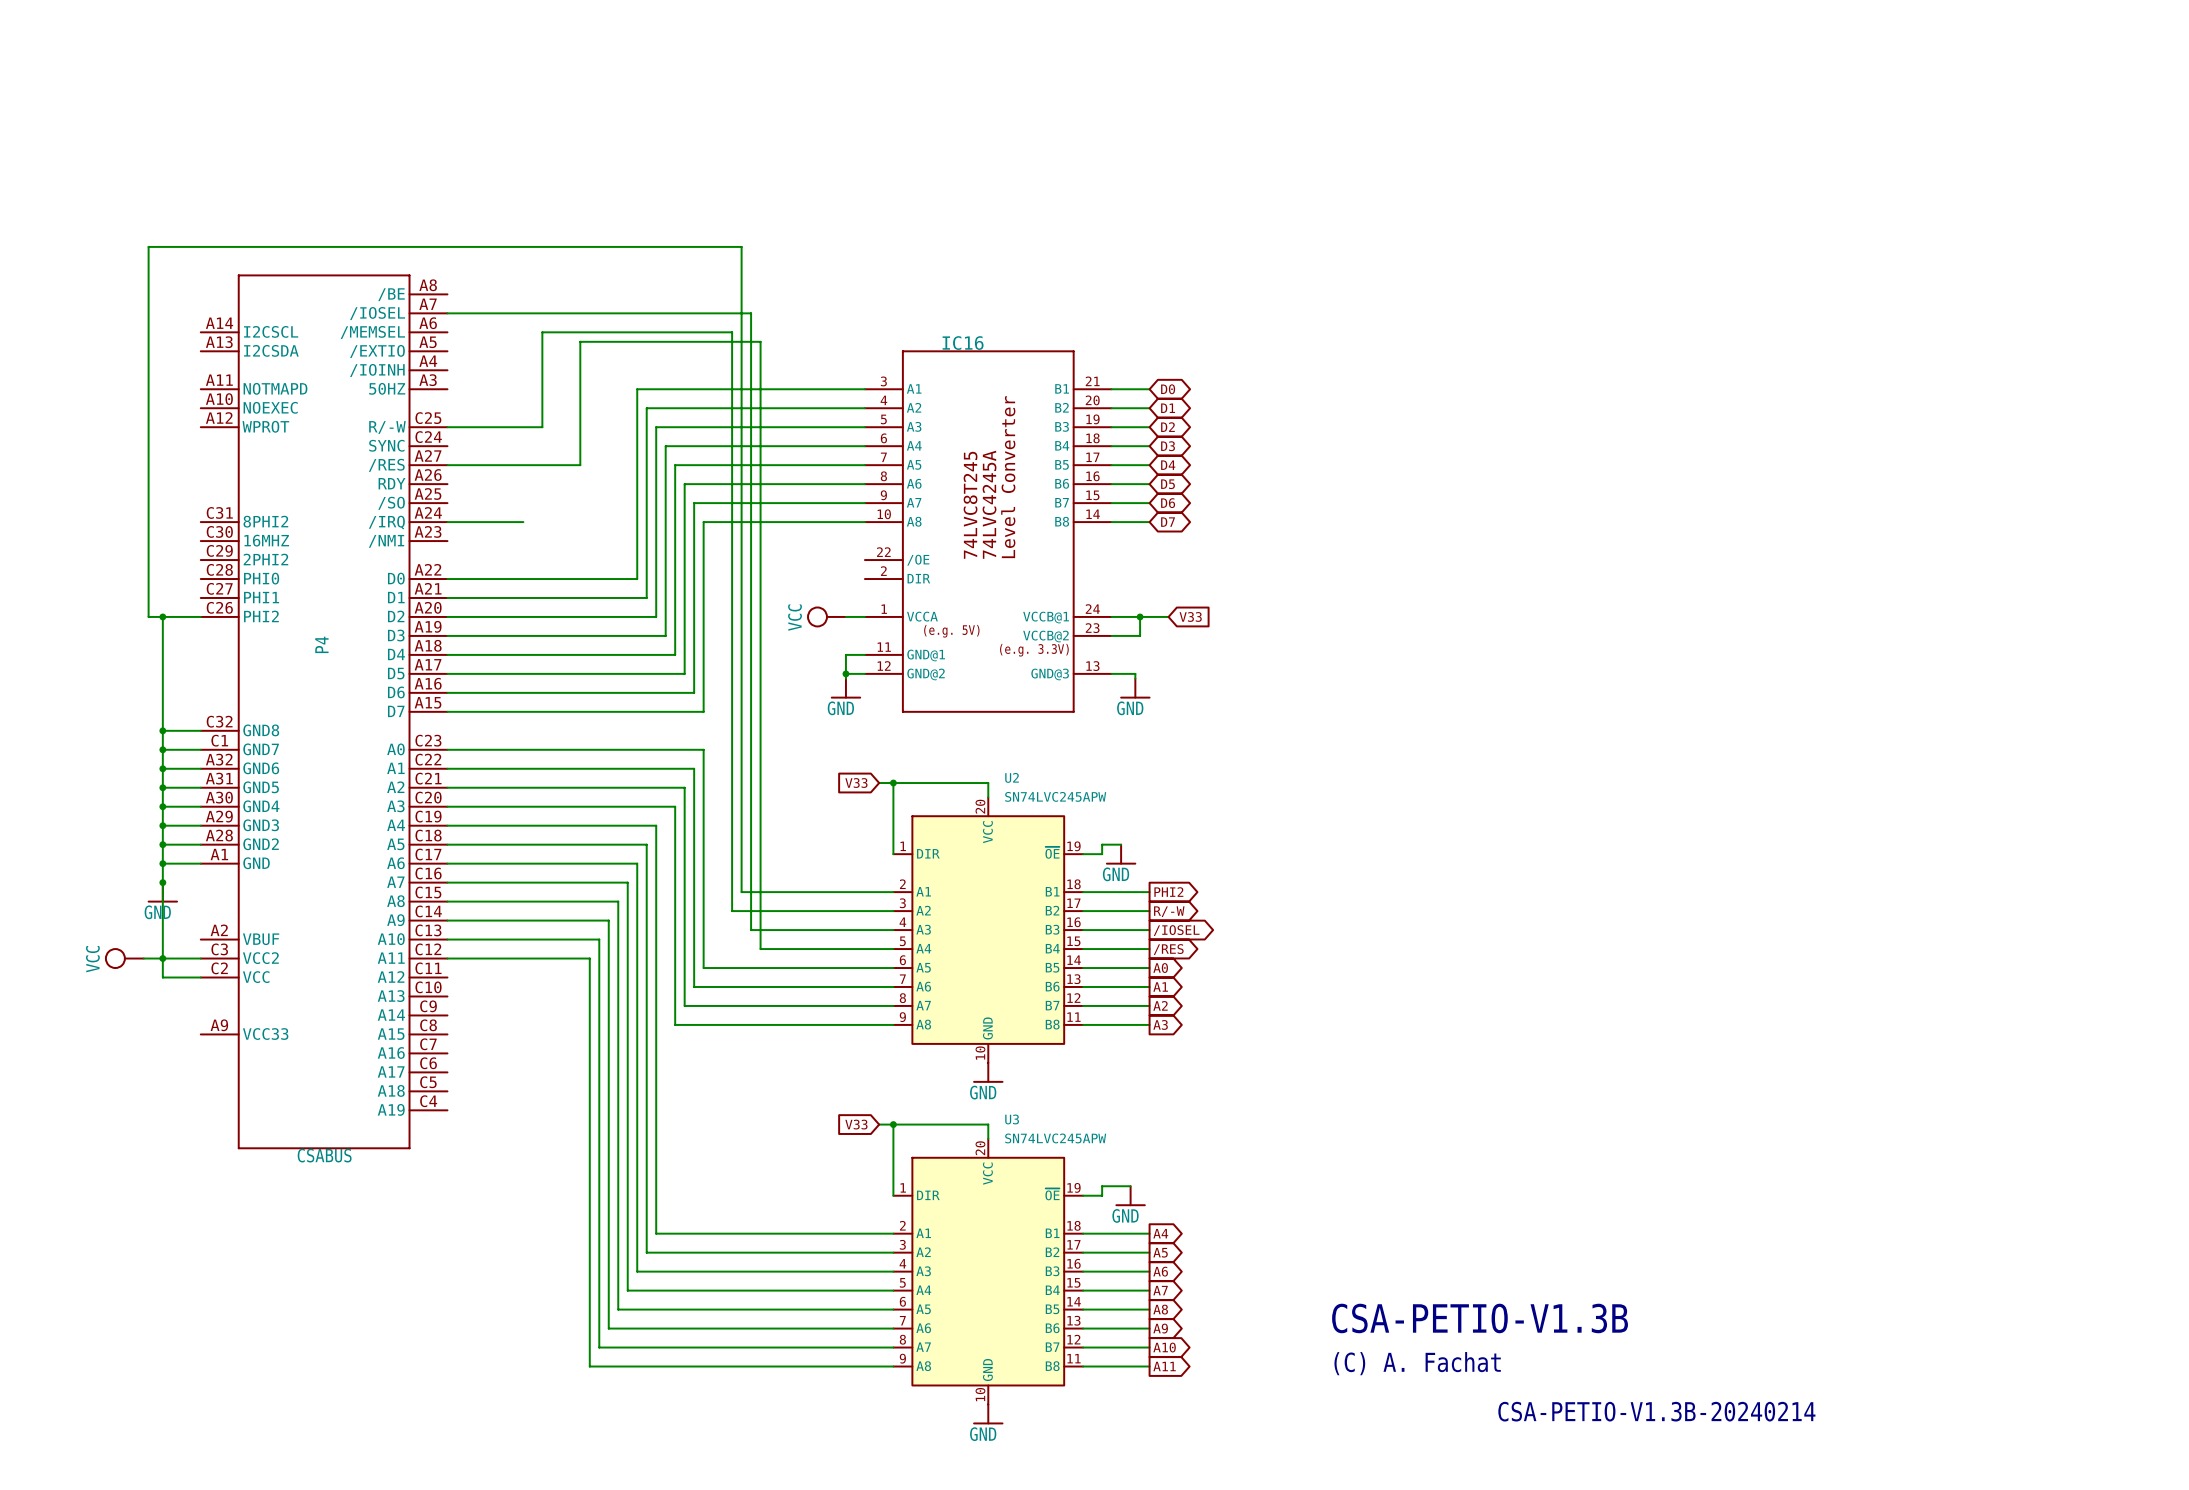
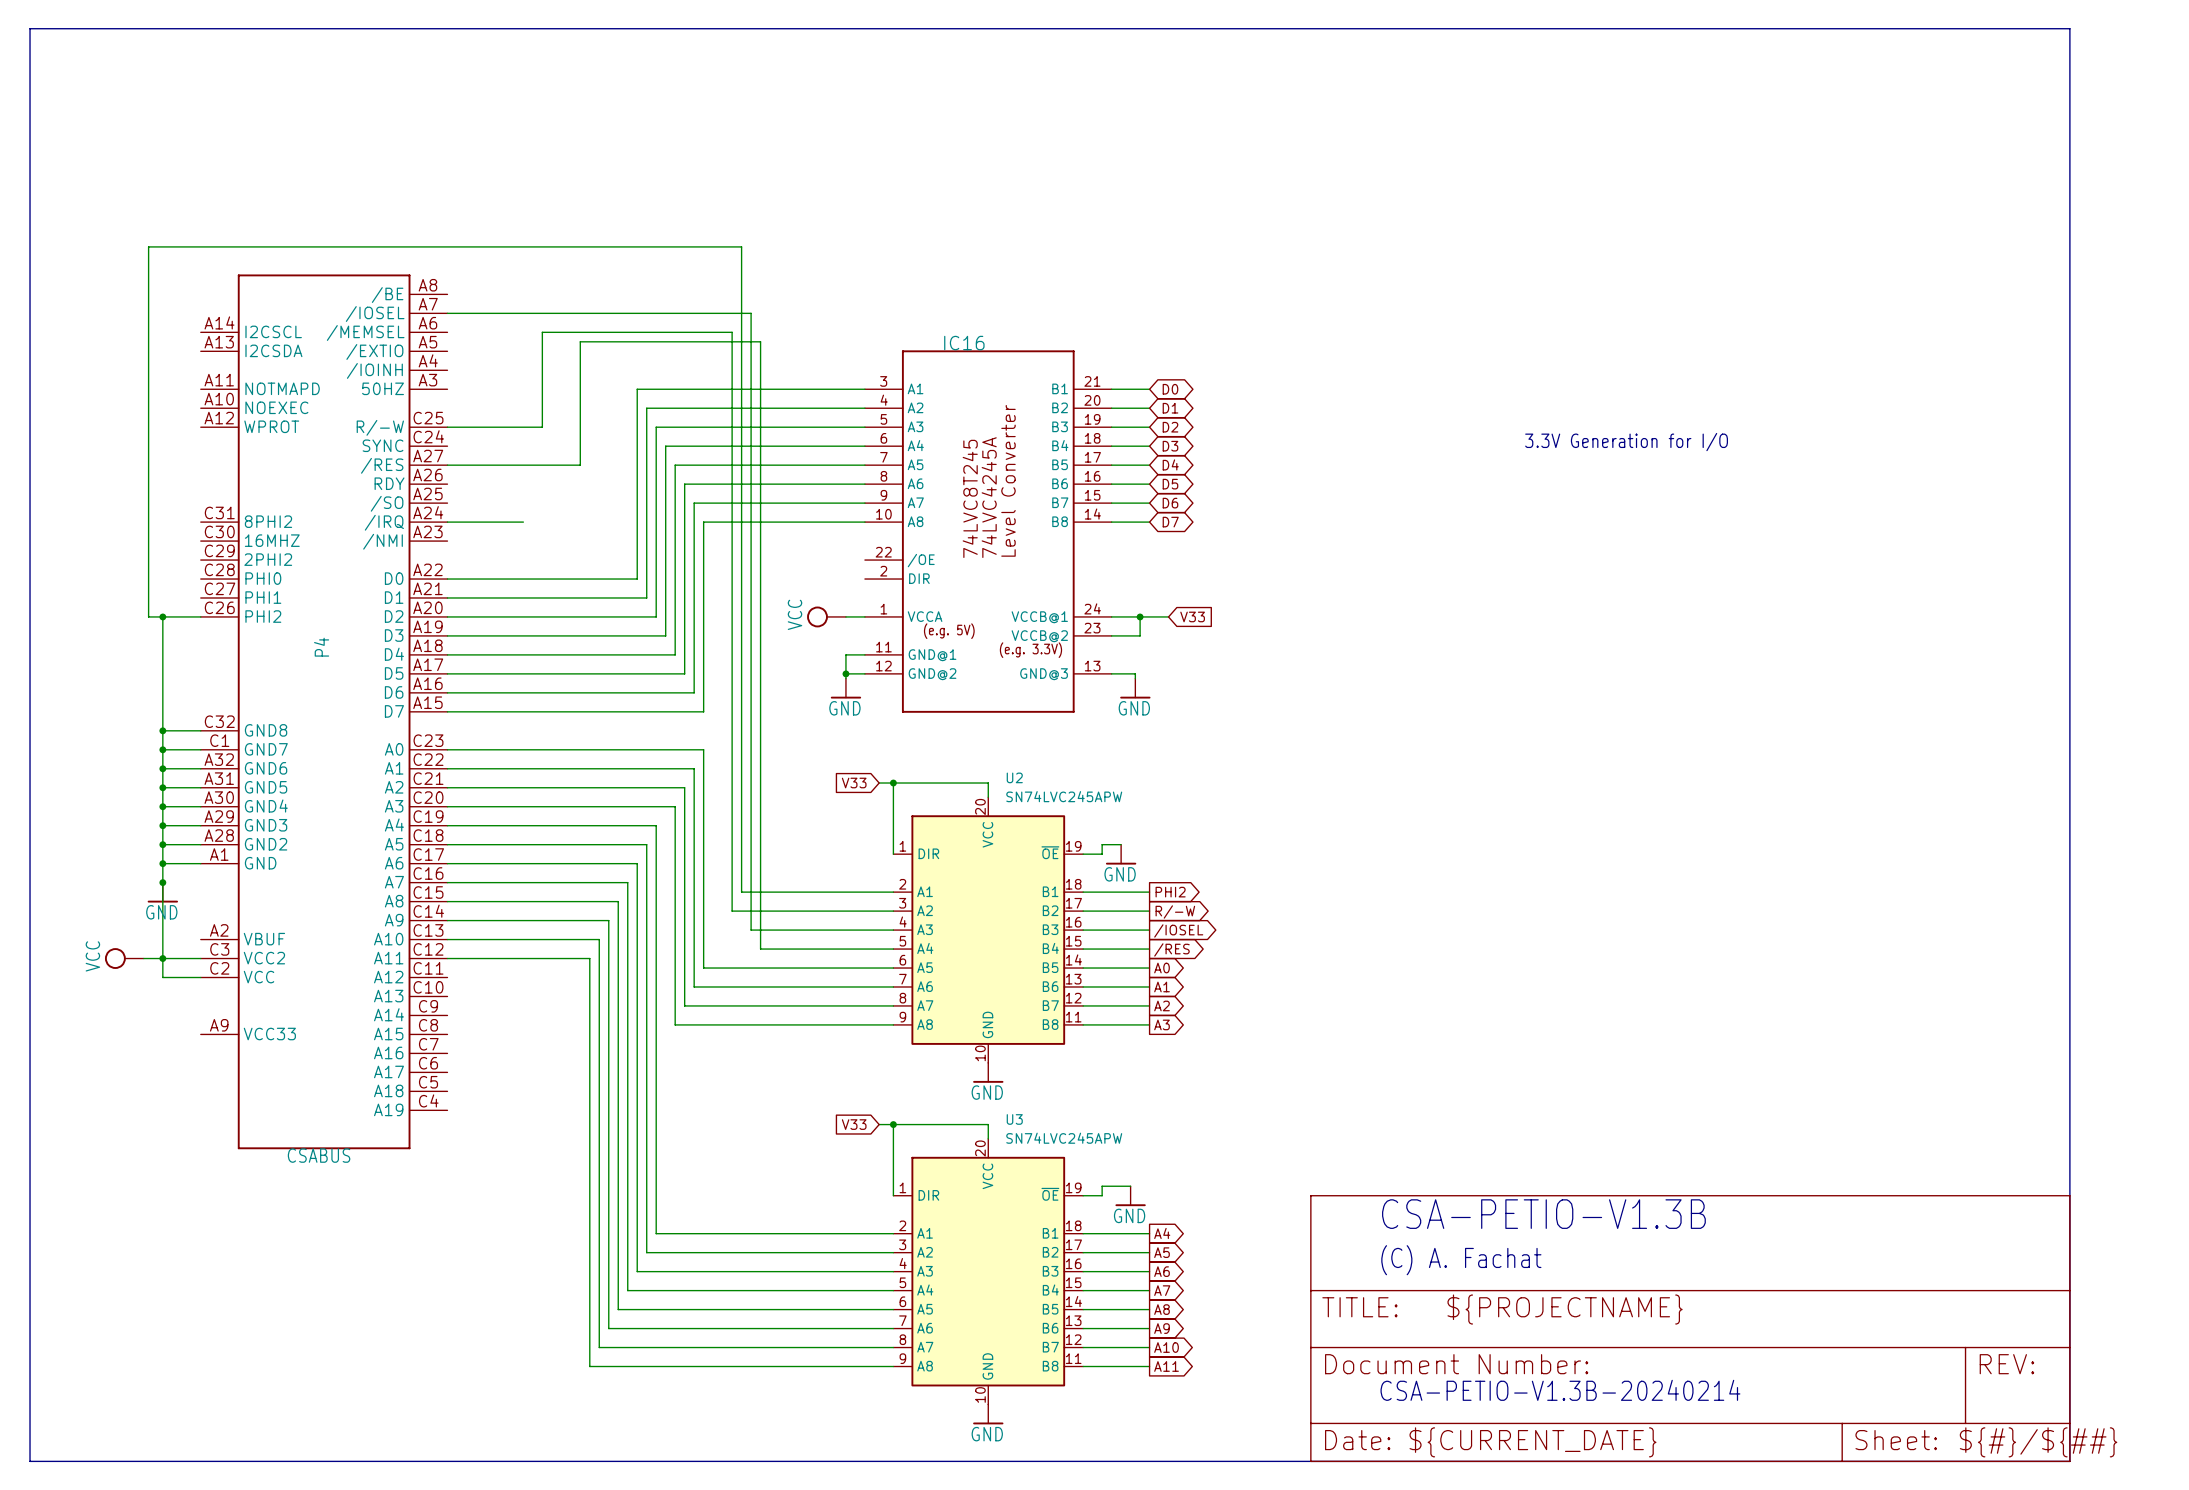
line: none -> (30, 28) (2069, 28) (2069, 1461) (30, 1461) (30, 28)
text: none -> 3.3V Generation for I/O (1626, 442)
text position: CSA-PETIO-V1.3B (1480, 1318) -> CSA-PETIO-V1.3B (1543, 1214)
power symbol: none -> (1690, 1328)
text position: (C) A. Fachat (1417, 1363) -> (C) A. Fachat (1461, 1260)
text position: CSA-PETIO-V1.3B-20240214 (1656, 1411) -> CSA-PETIO-V1.3B-20240214 (1560, 1390)

